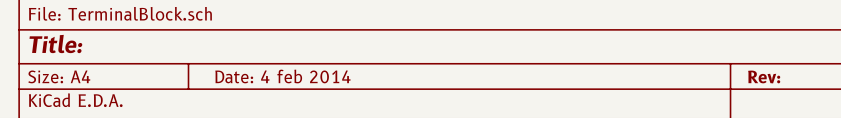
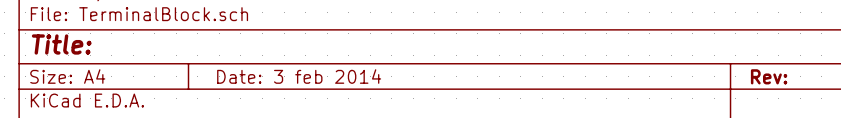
title block: Date: 4 feb 2014 (282, 76) -> Date: 3 feb 2014 (299, 76)

